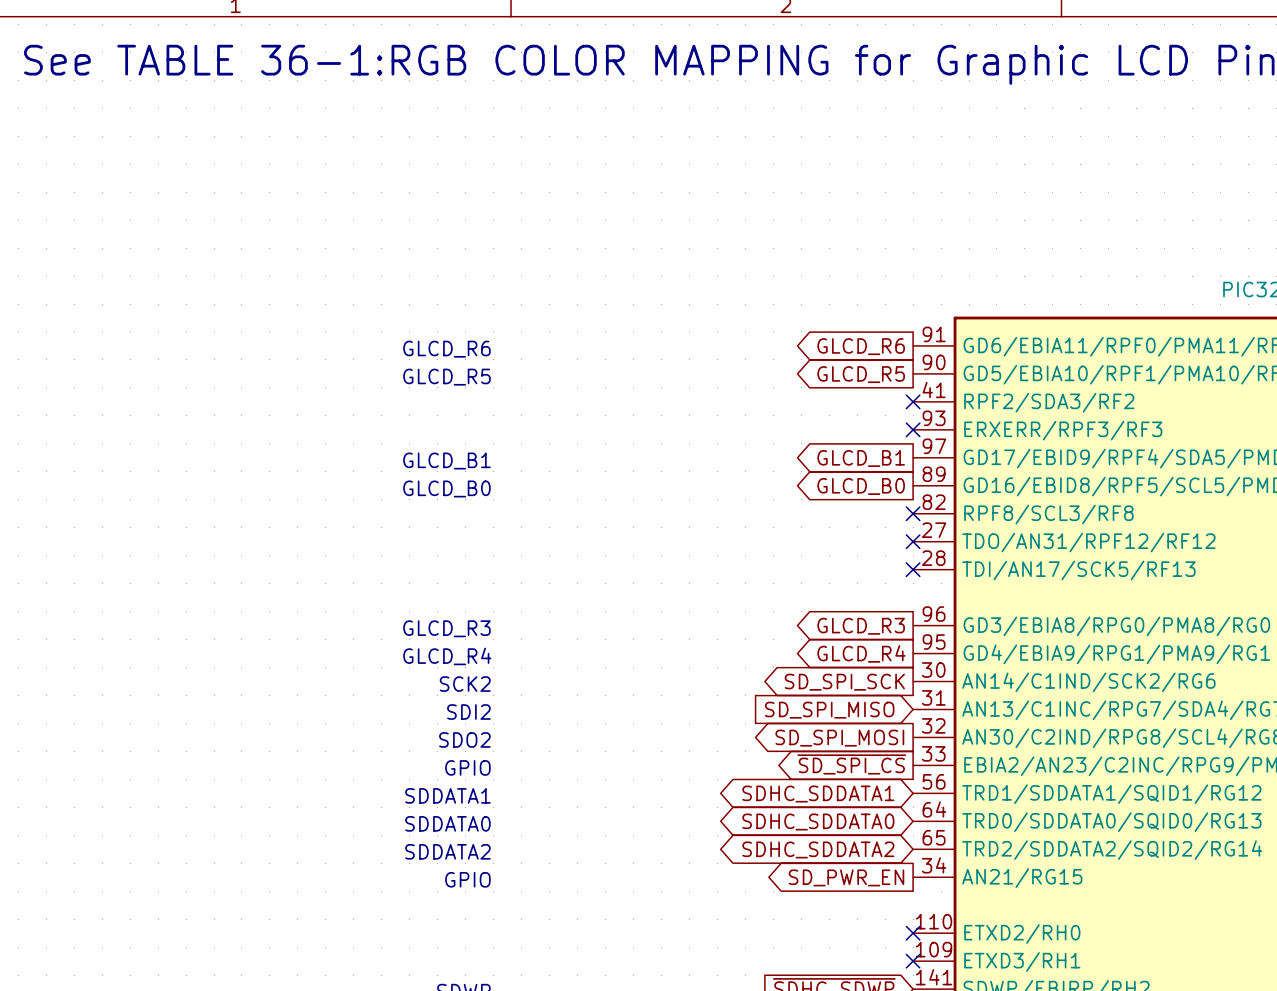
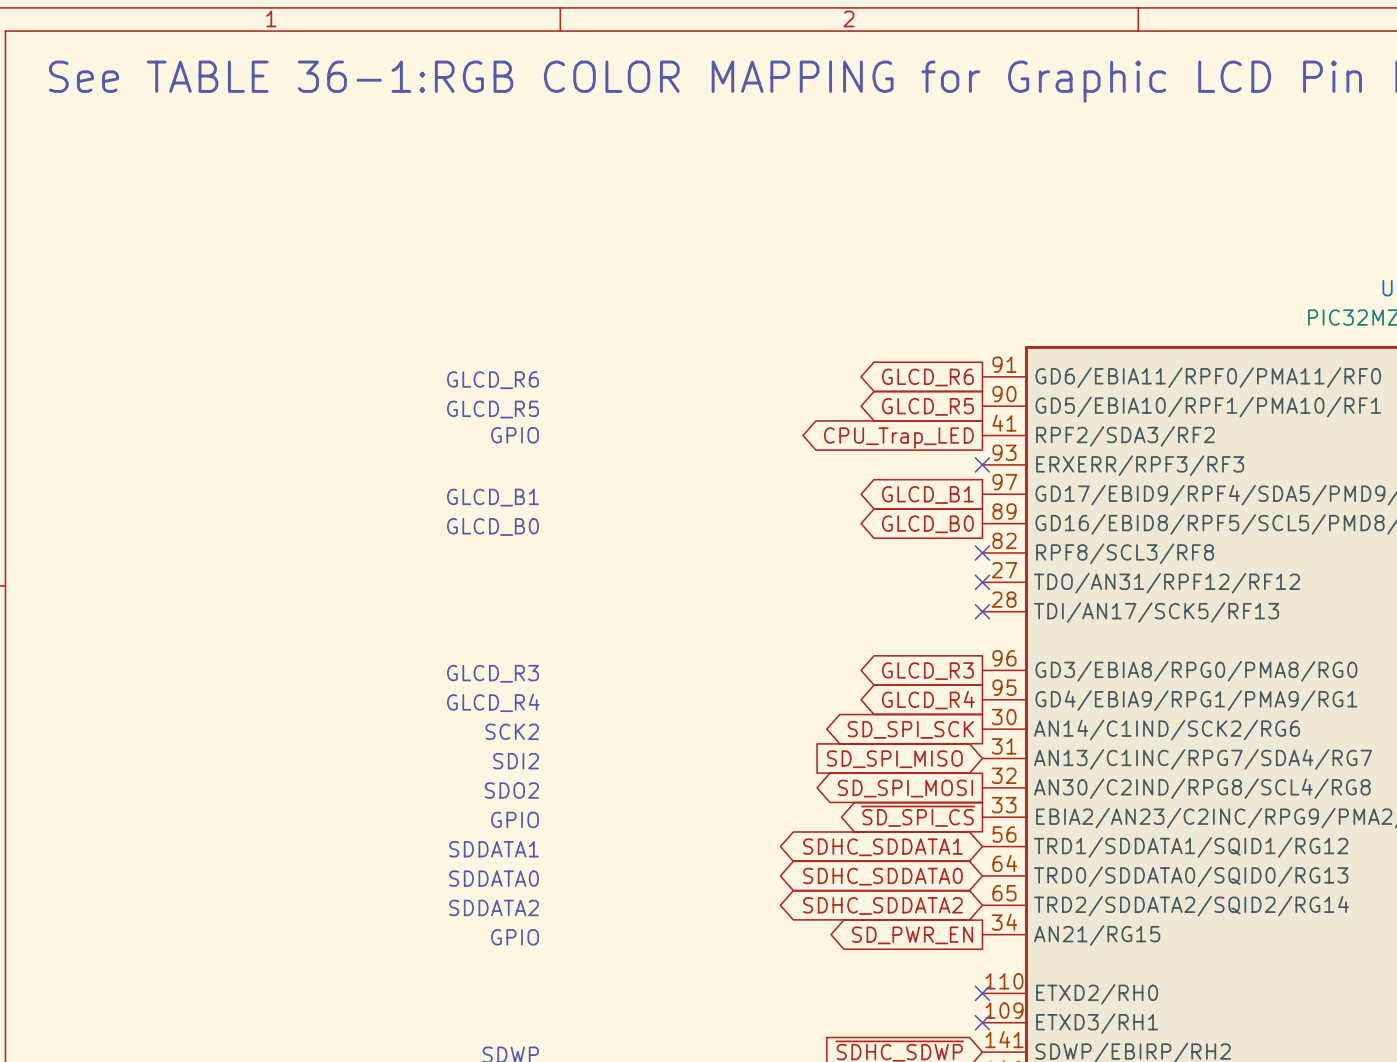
text: none -> GPIO (515, 435)
no-connect mark: (913, 401) -> none
global label: none -> CPU_Trap_LED (898, 437)

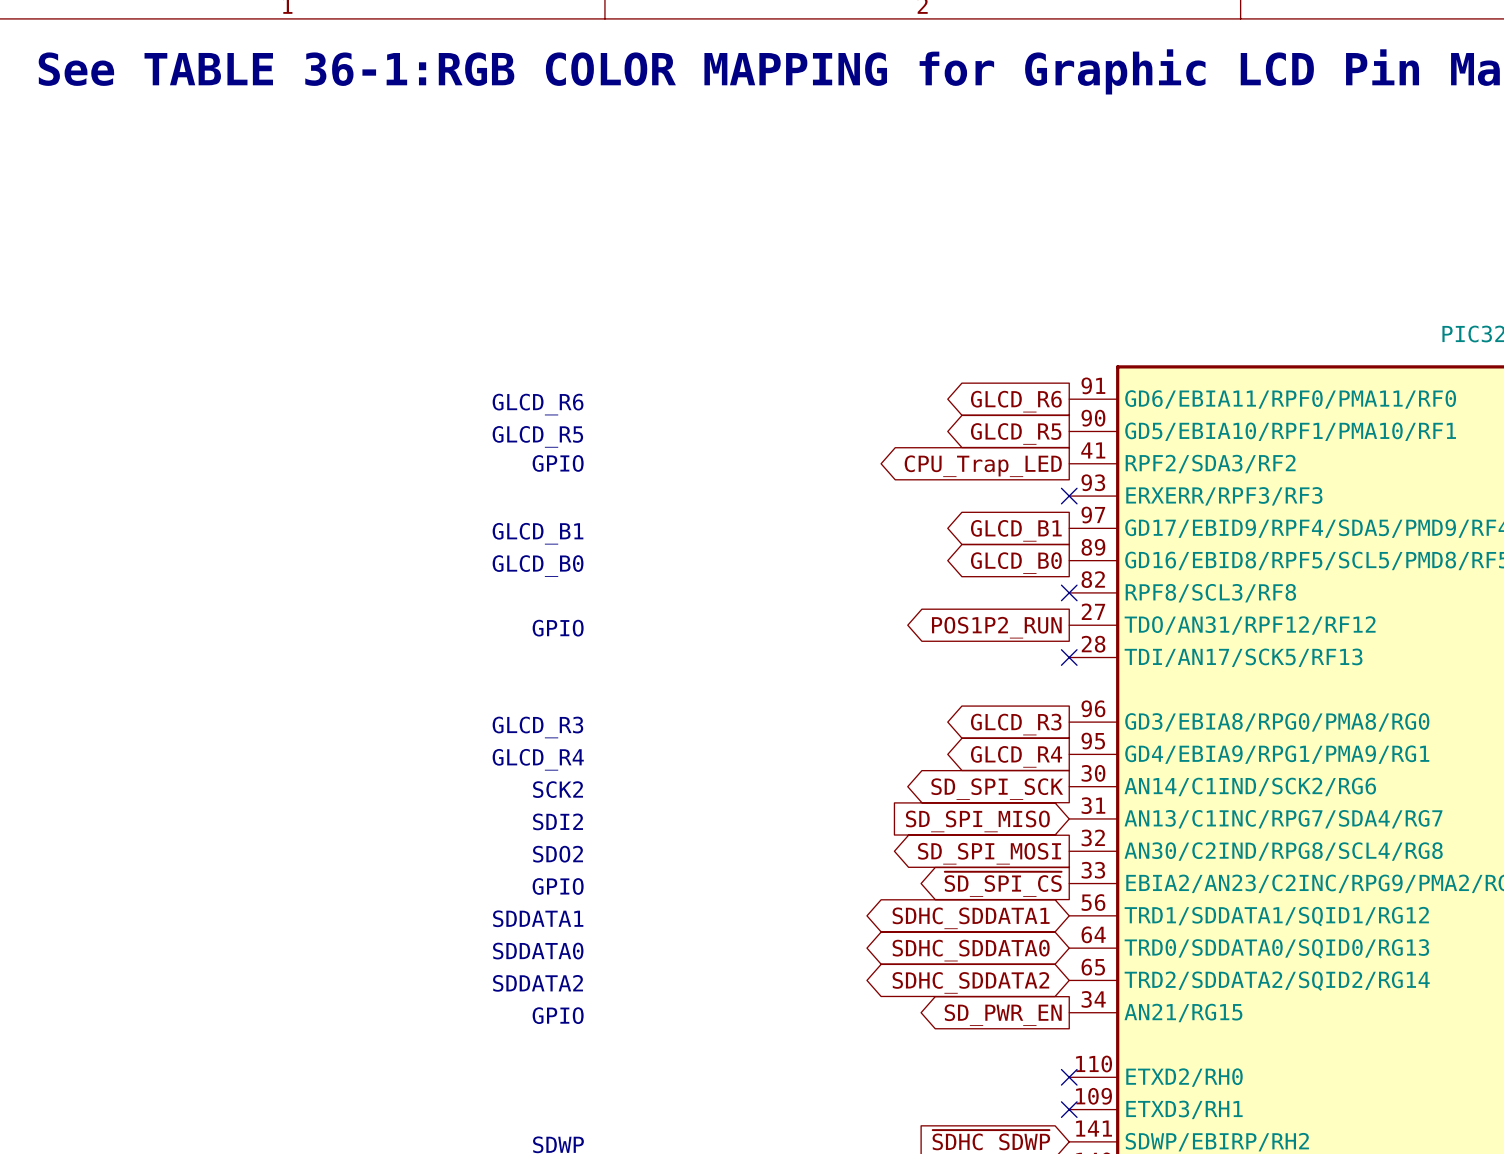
no-connect mark: (982, 582) -> none
global label: none -> POS1P2_RUN (996, 627)
text: none -> GPIO (558, 628)

